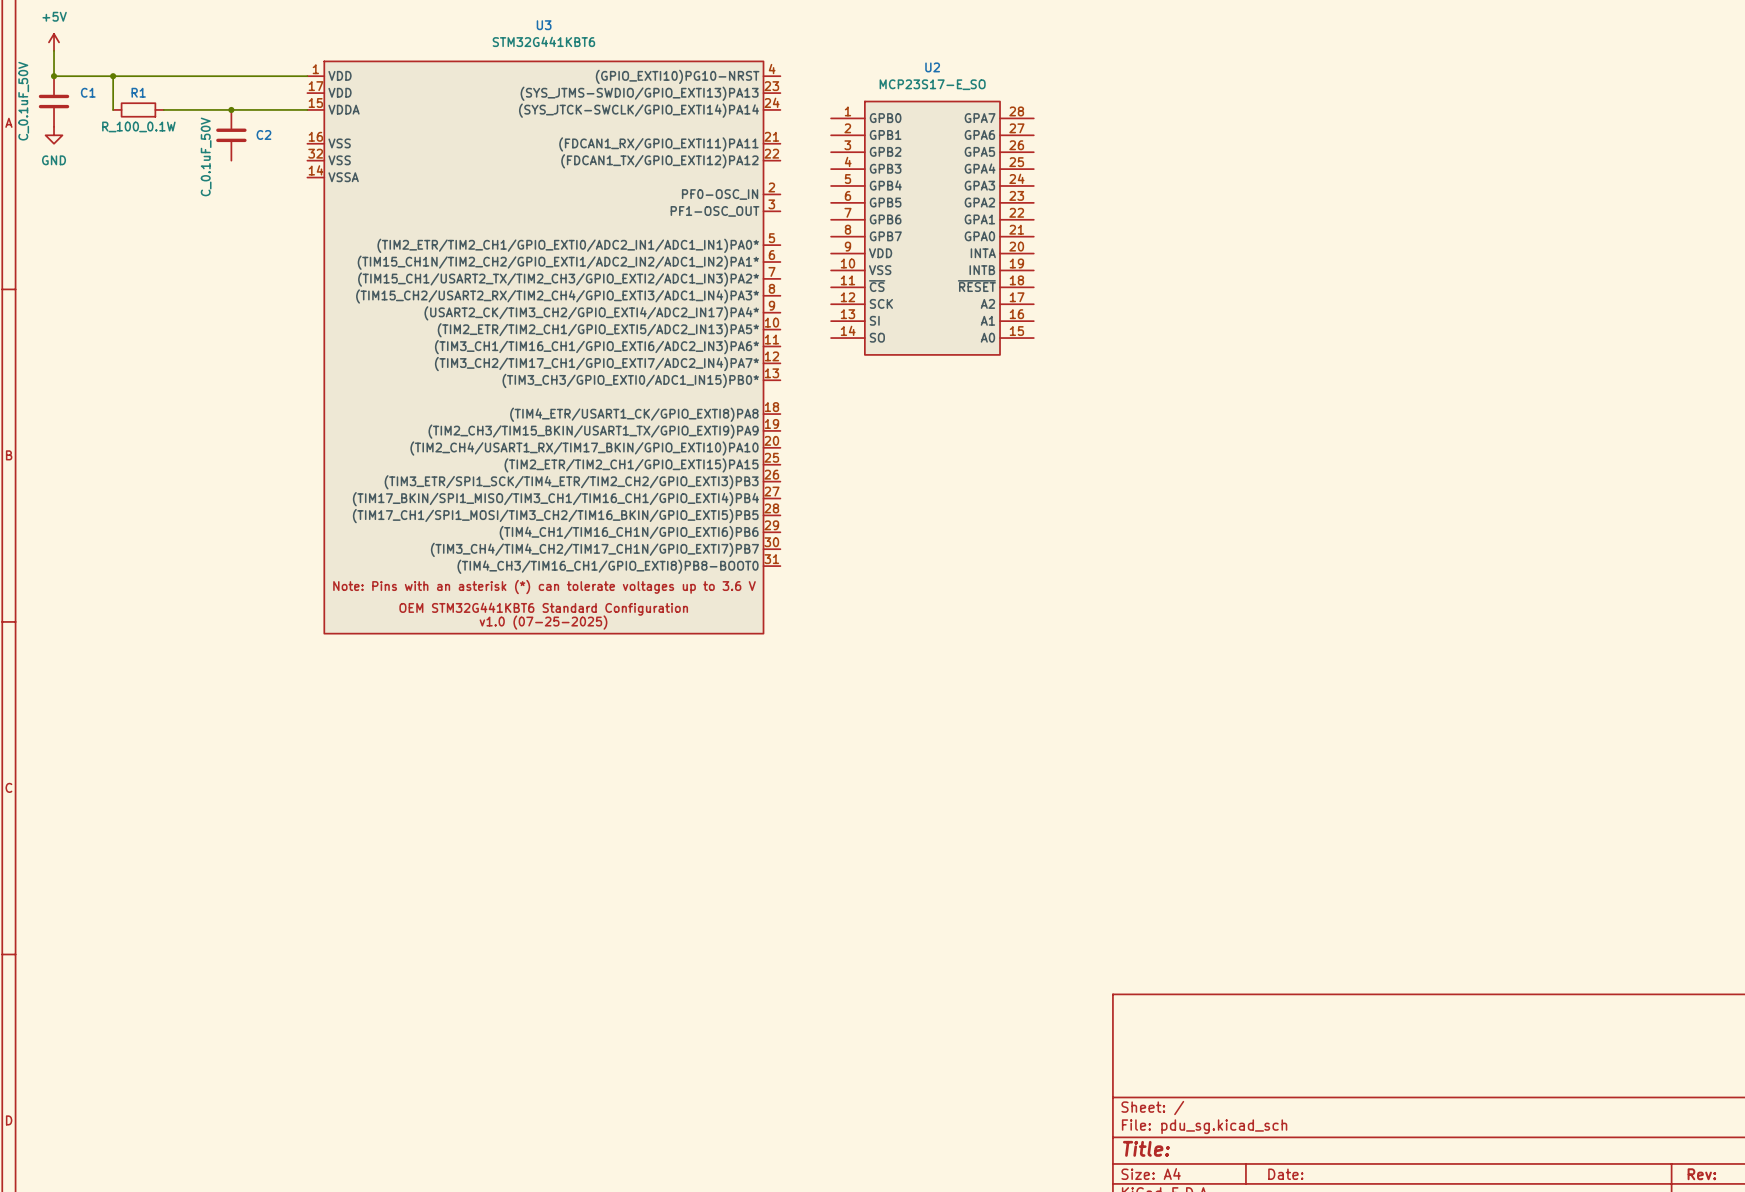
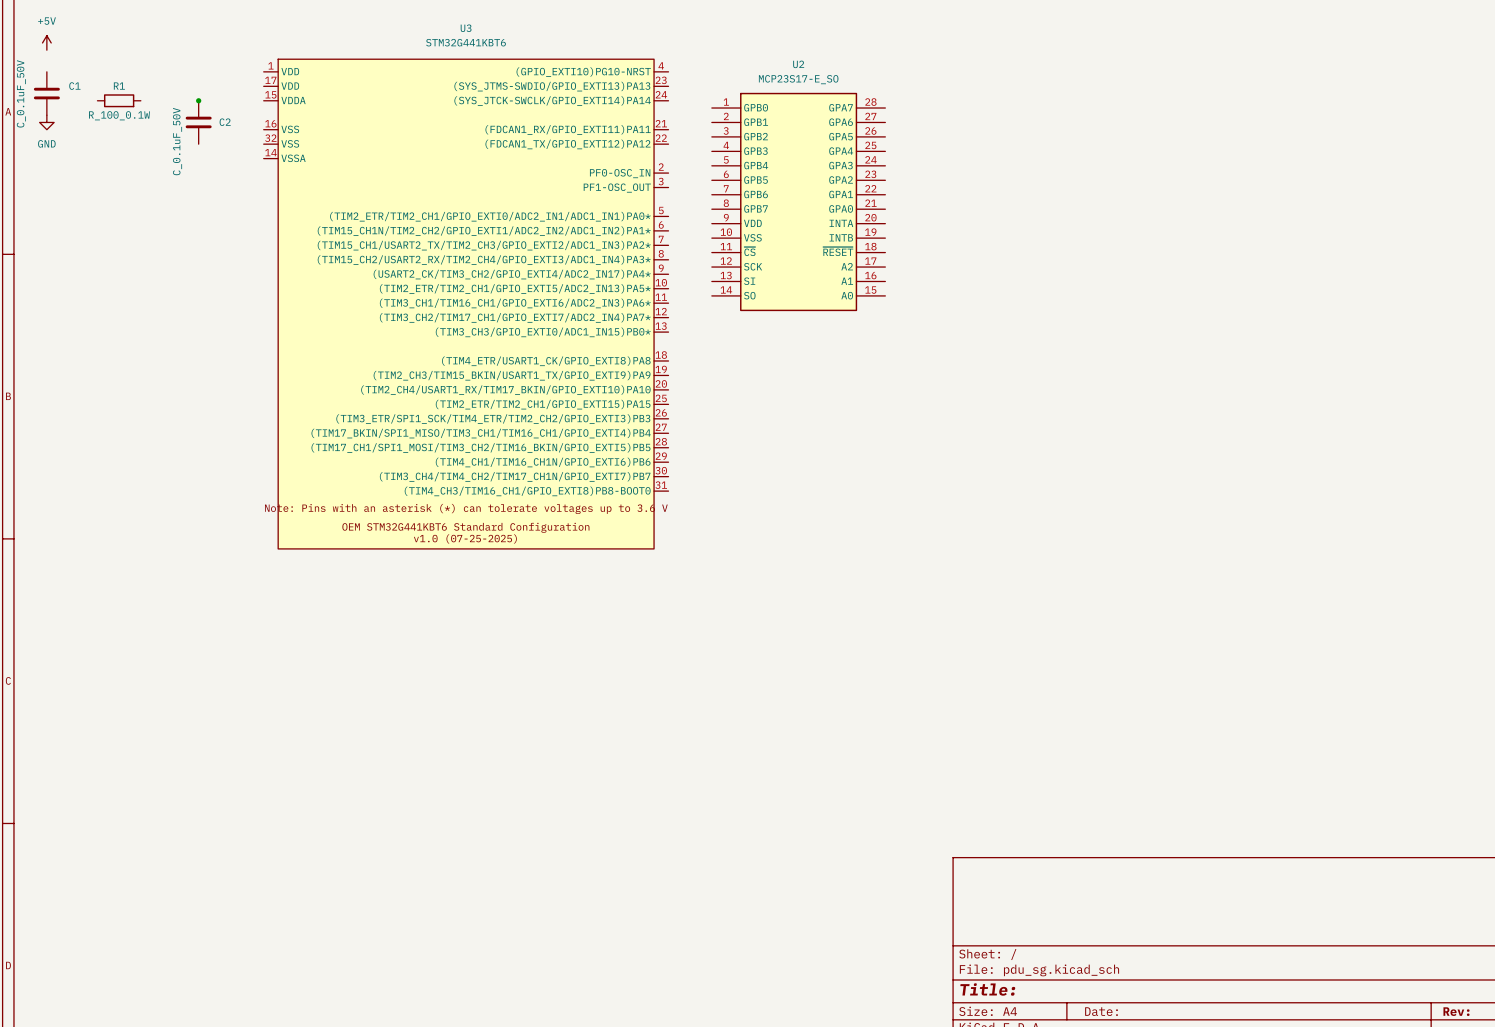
wire: (54, 50) (54, 76) (307, 76) -> none
junction: (54, 76) -> none
wire: (113, 76) (113, 109) -> none
junction: (113, 76) -> none
wire: (163, 109) (307, 109) -> none

